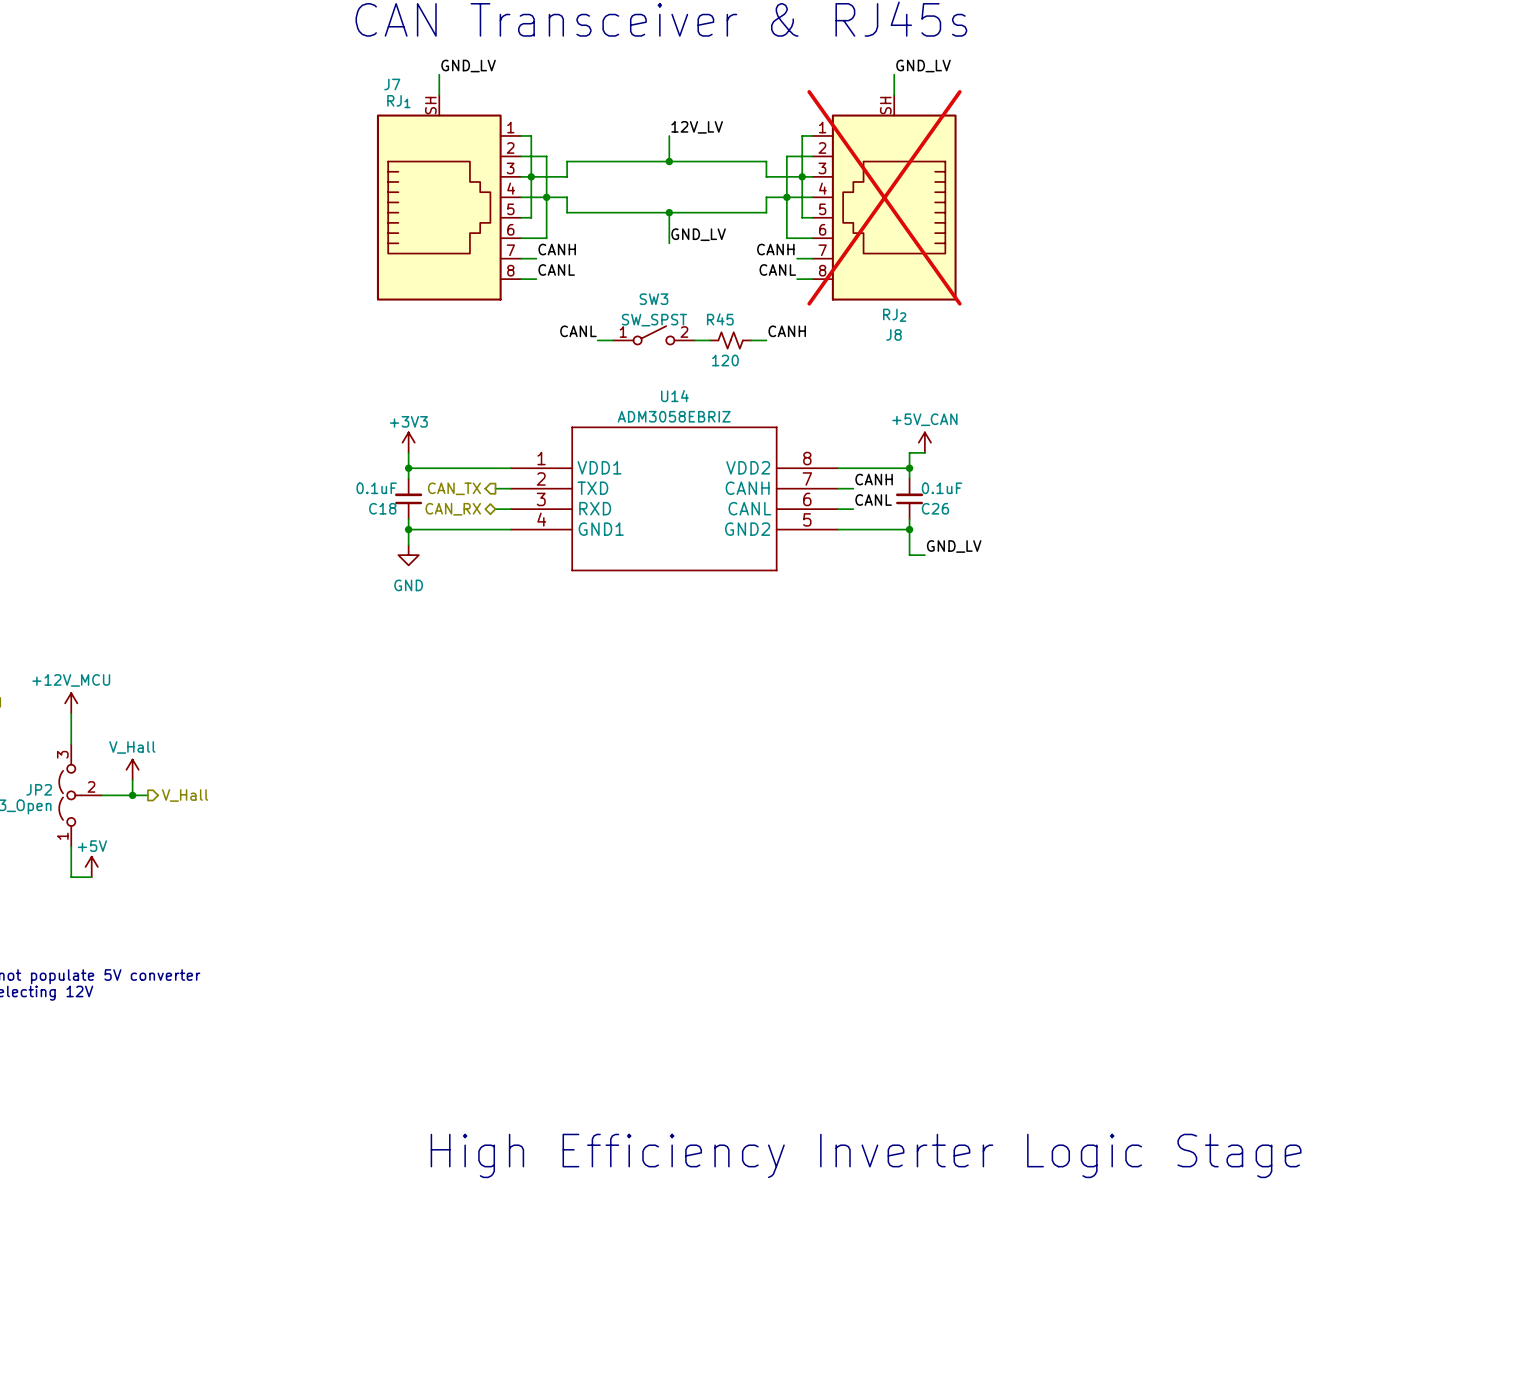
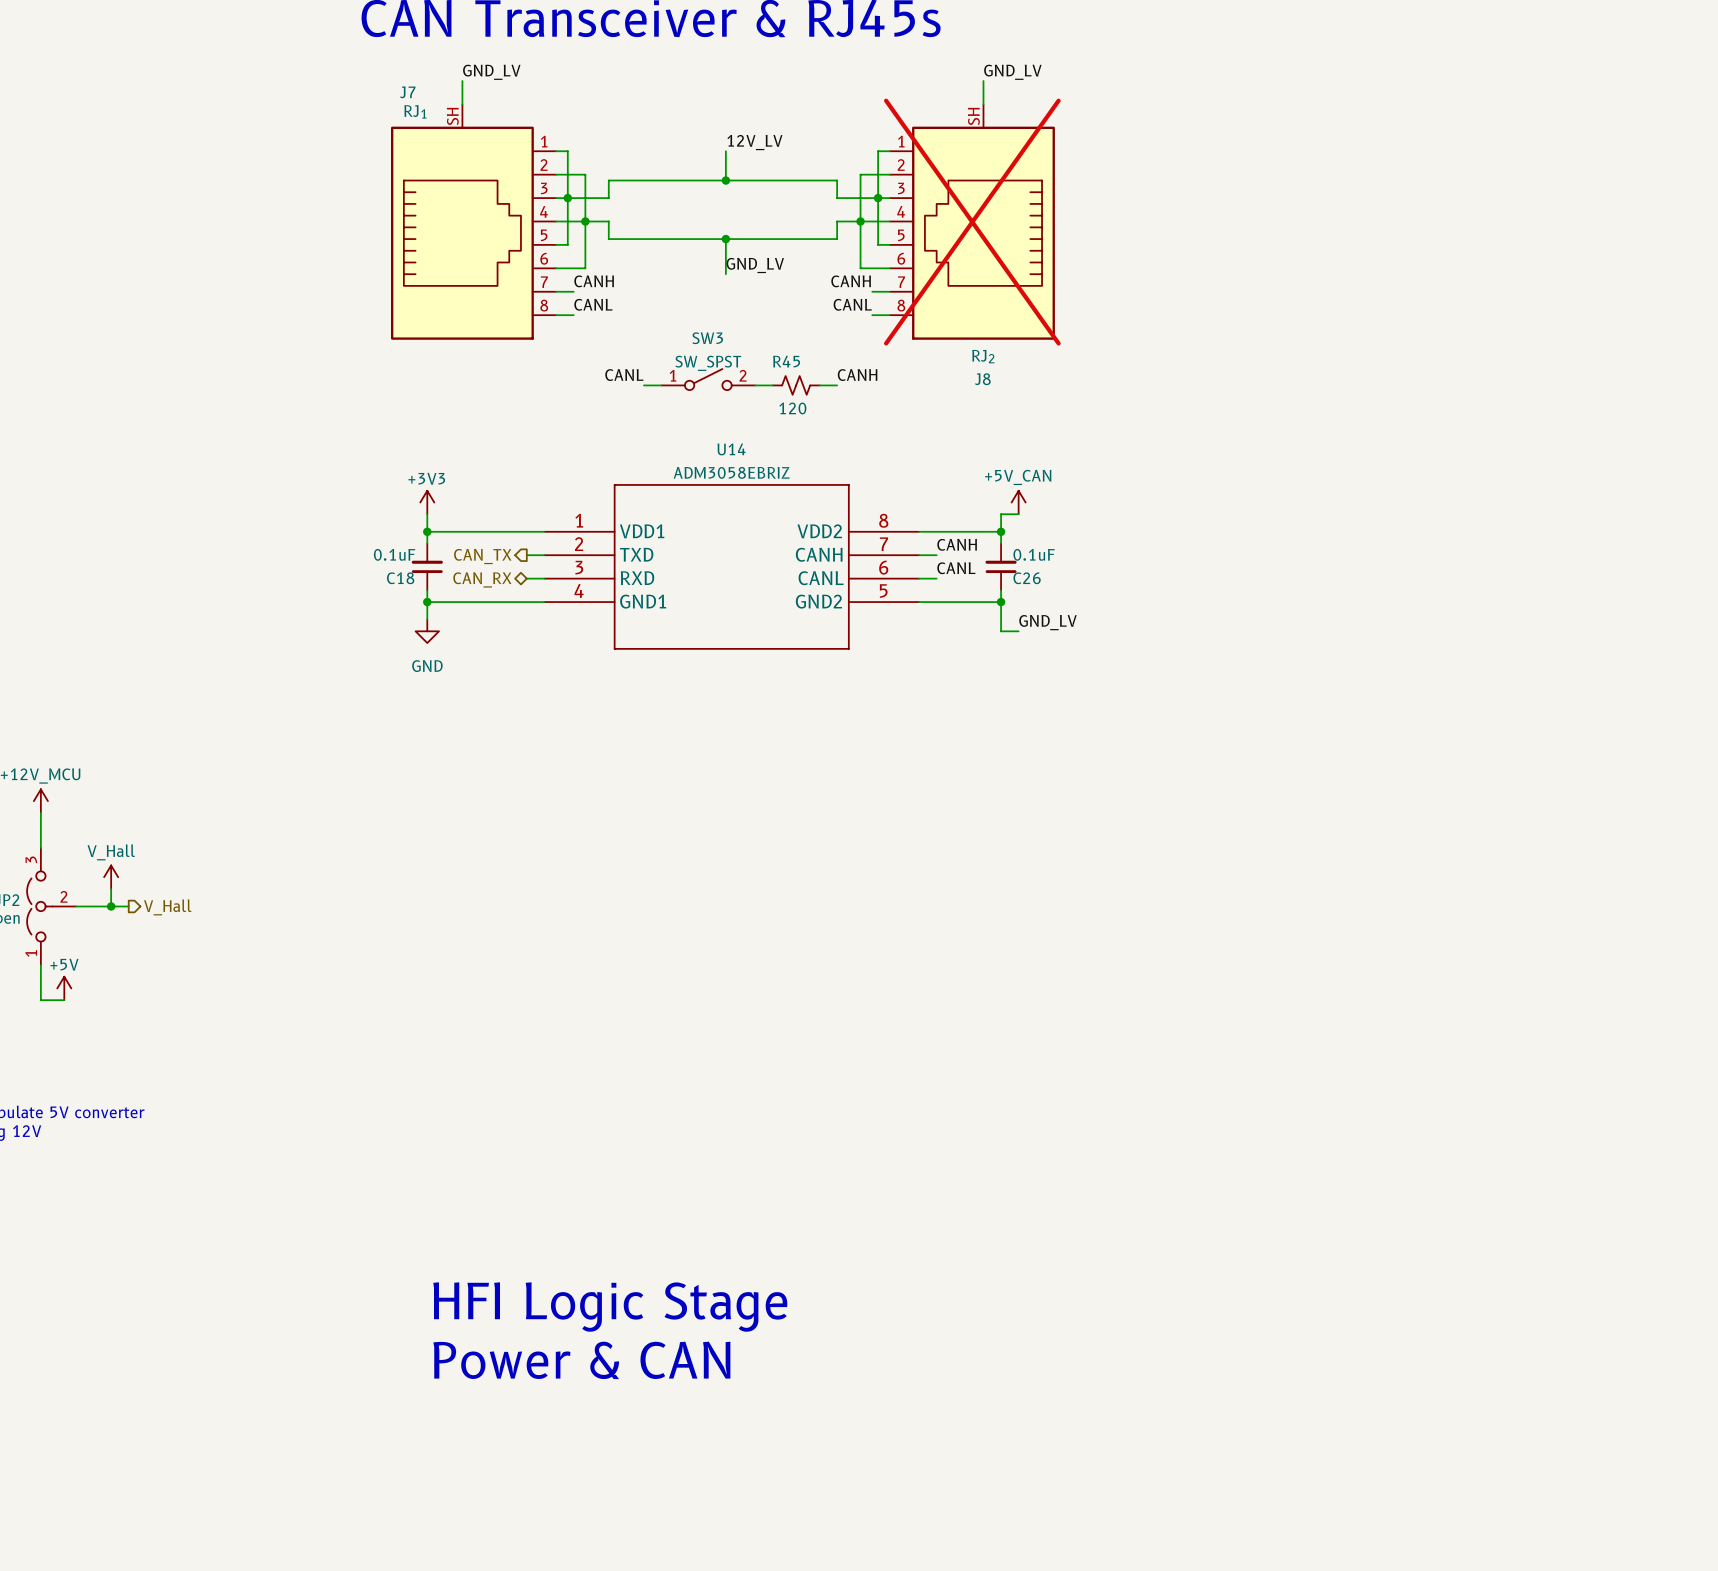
text: none -> HFI Logic Stage (610, 1307)
text: High Efficiency Inverter Logic Stage (866, 1155) -> none
text: none -> Power & CAN (581, 1360)

